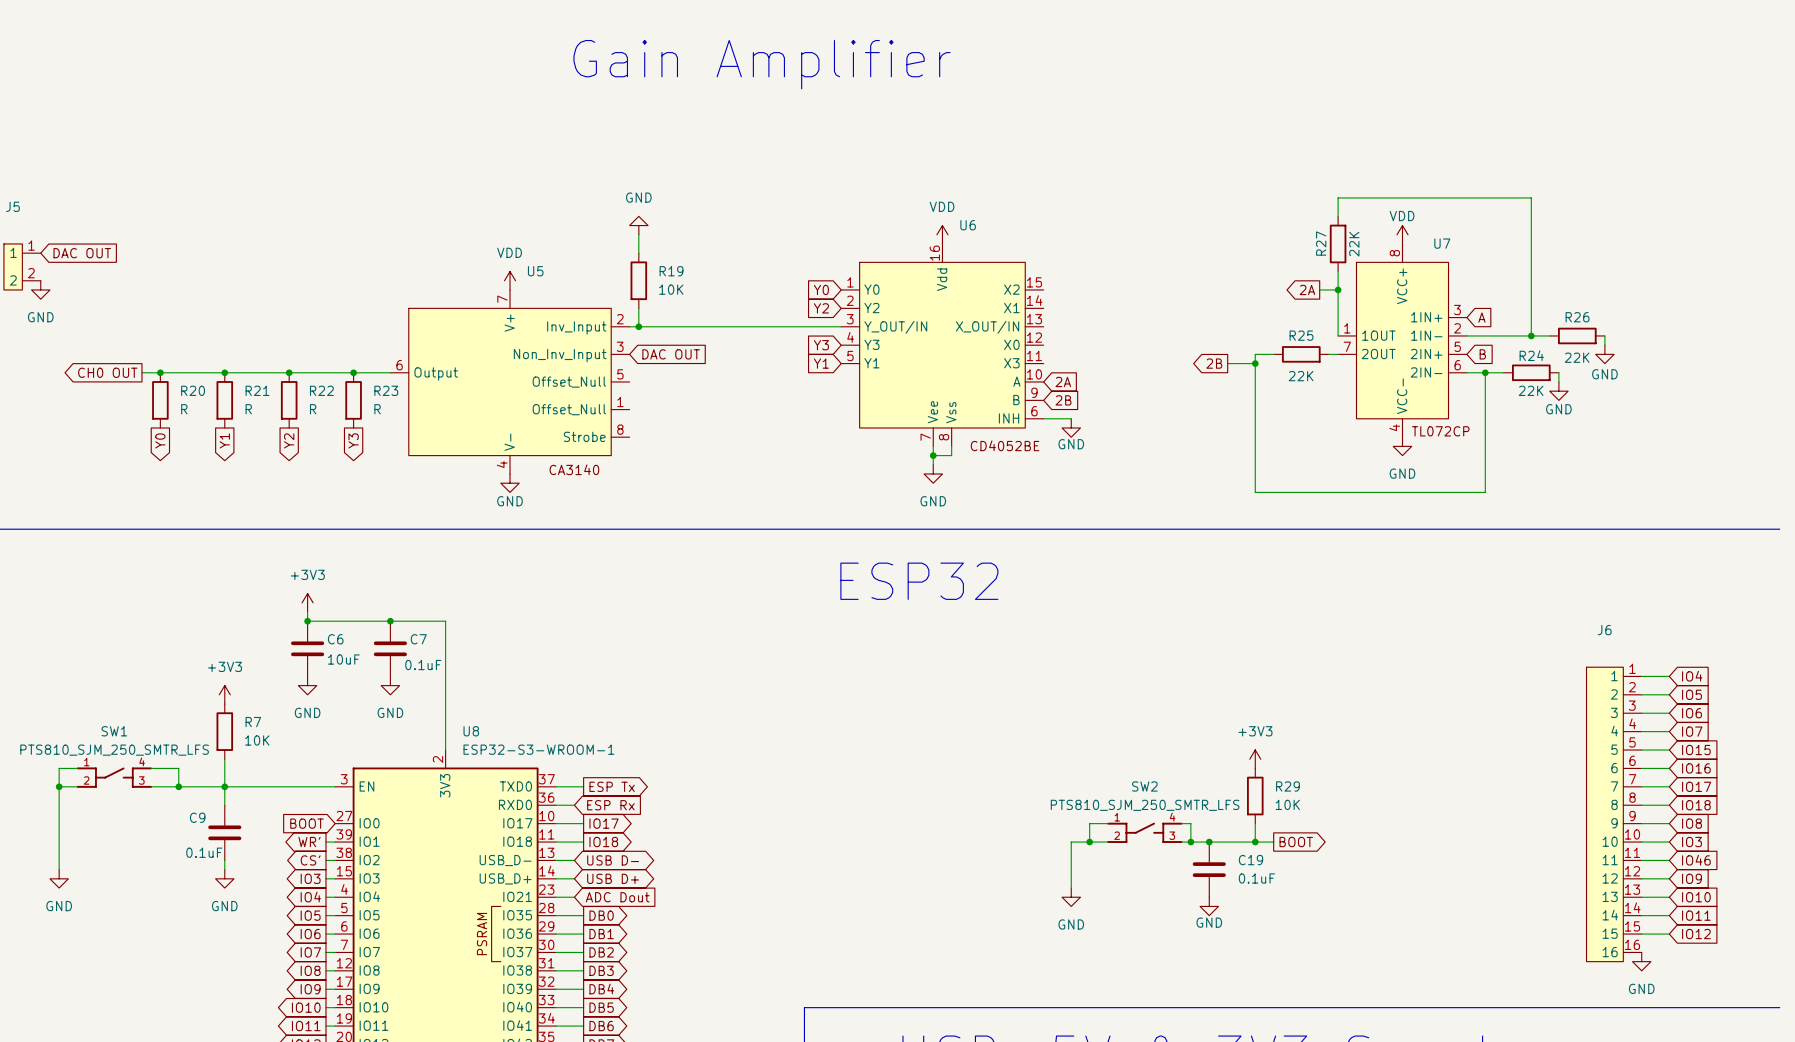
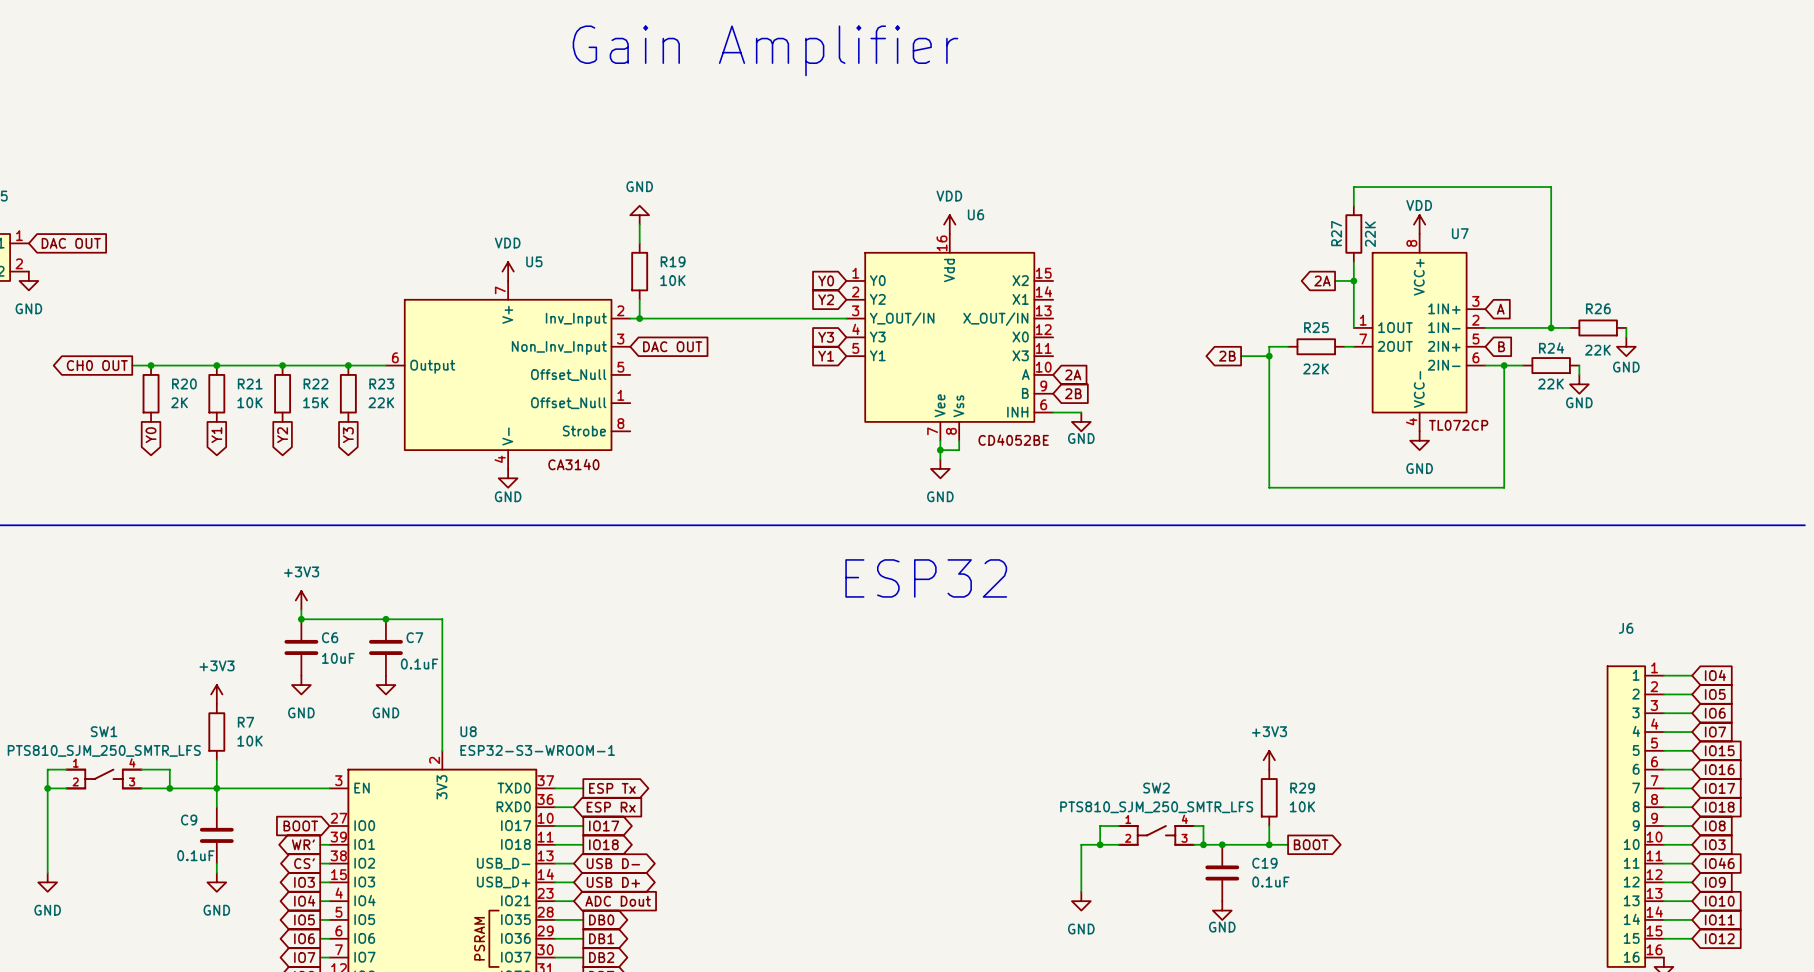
R20 value: R (184, 409) -> 2K (179, 402)
R21 value: R (248, 409) -> 10K (250, 402)
R22 value: R (313, 409) -> 15K (315, 402)
R23 value: R (377, 409) -> 22K (381, 402)

